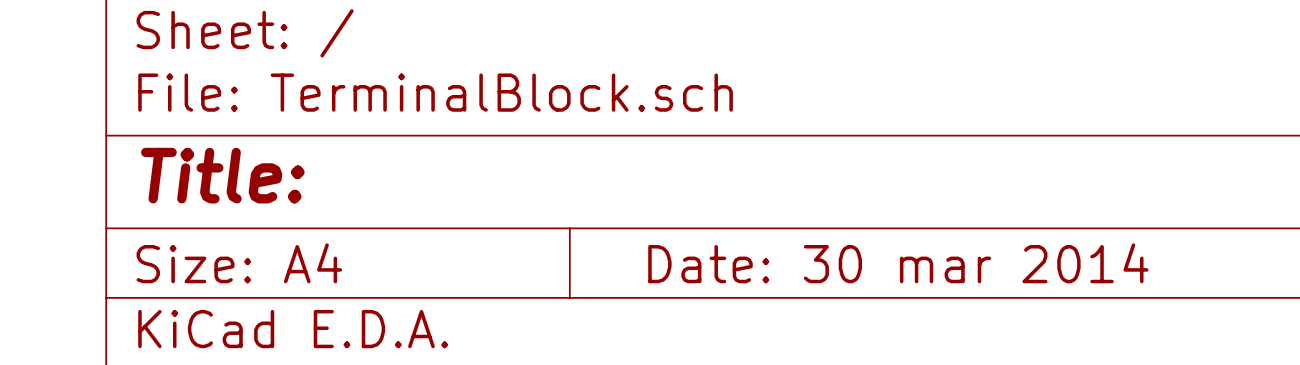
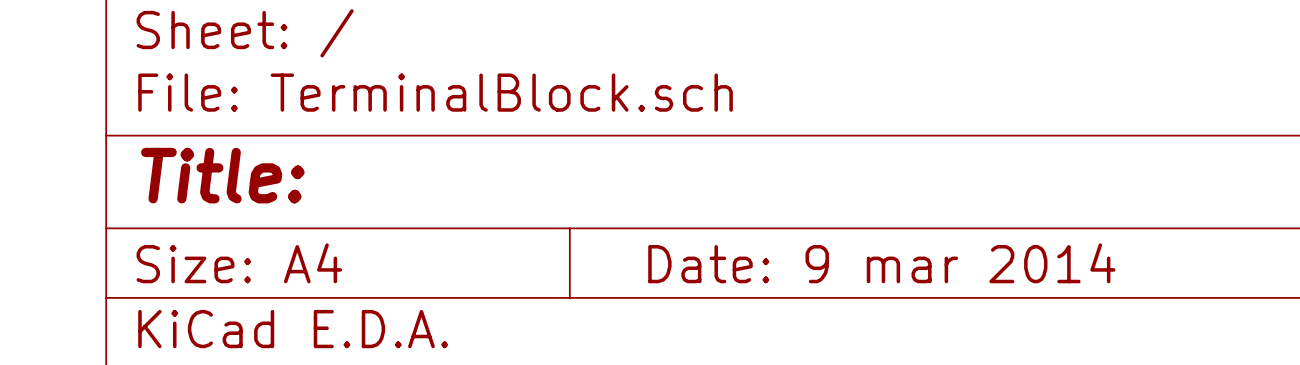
title block: Date: 30 mar 2014 (898, 263) -> Date: 9 mar 2014 (881, 263)

